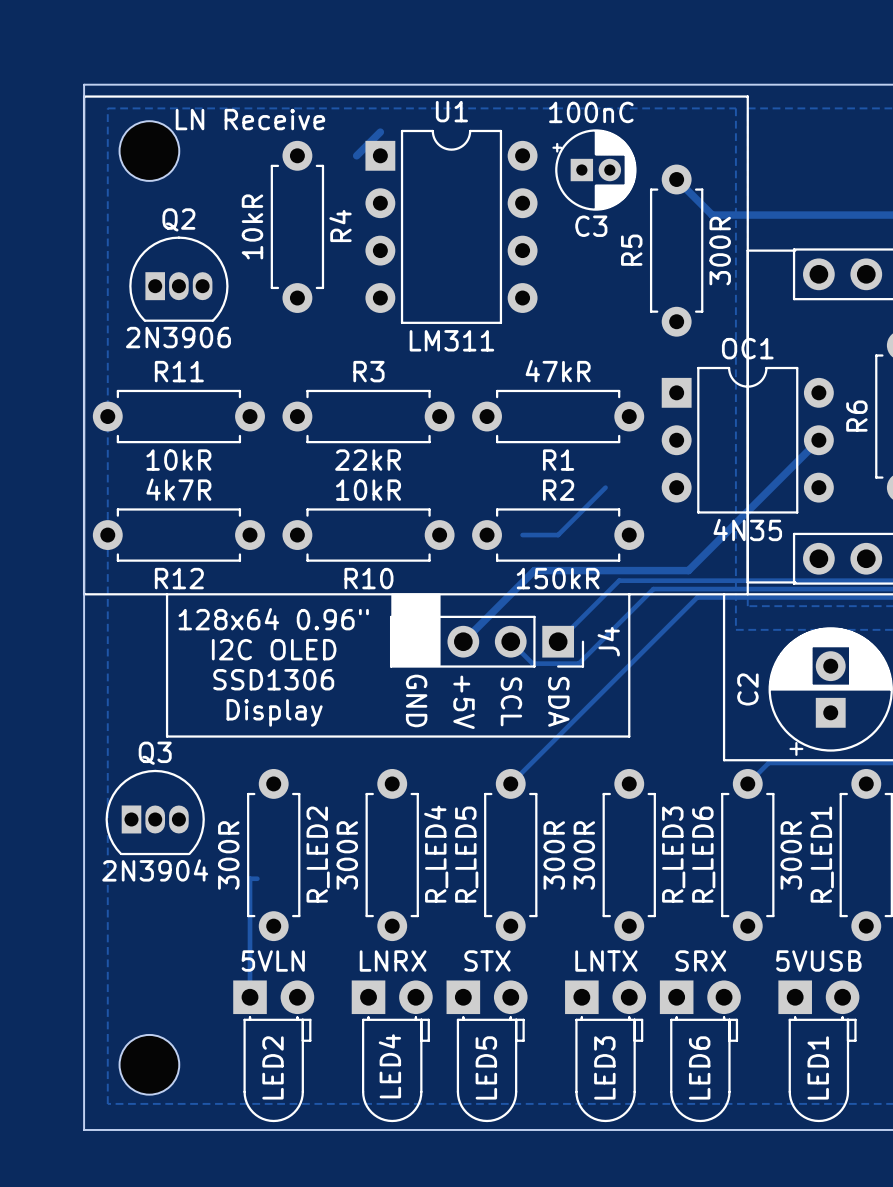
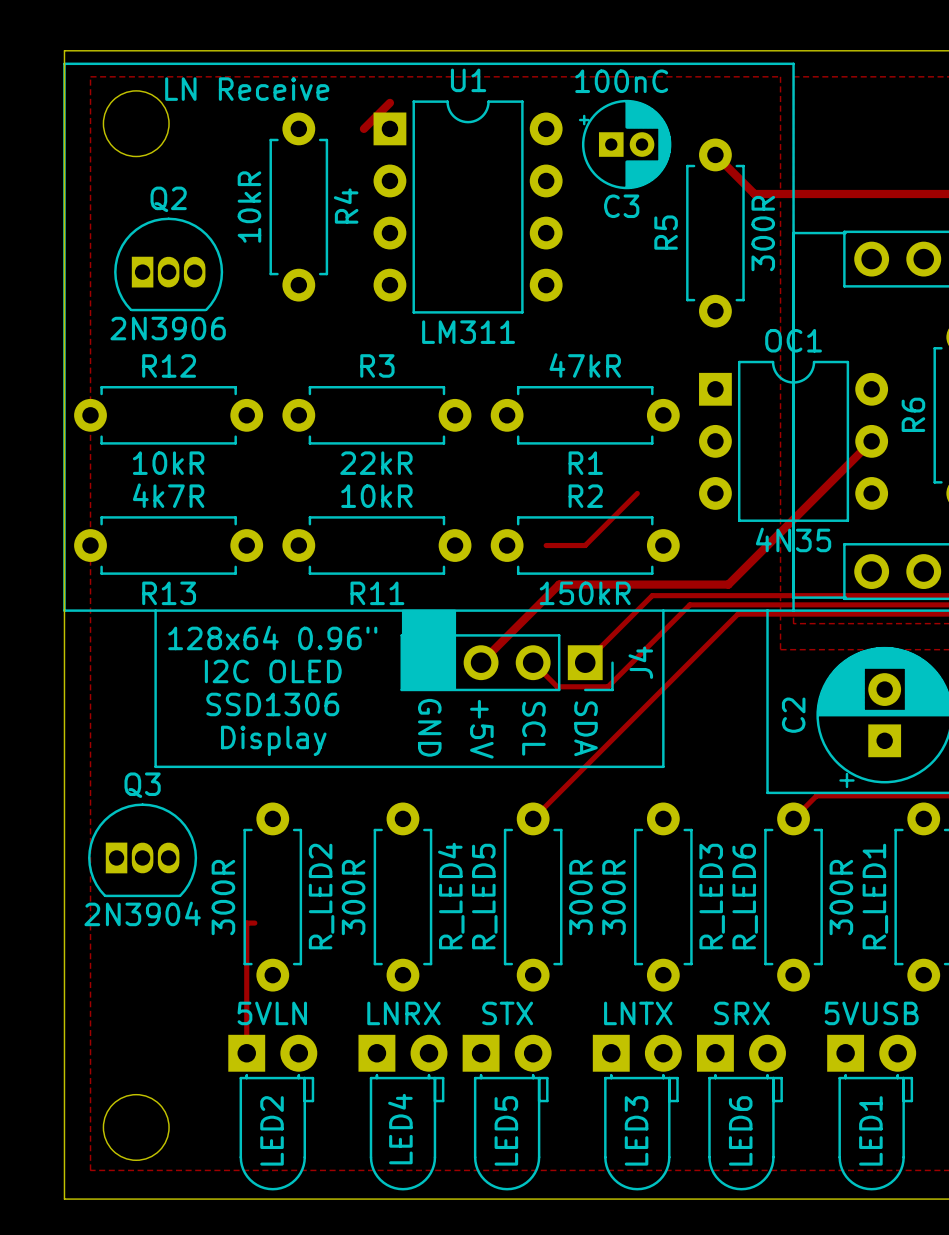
R11 name: R11 (179, 371) -> R12 (169, 365)
R12 name: R12 (179, 578) -> R13 (169, 593)
R10 name: R10 (368, 578) -> R11 (377, 593)

